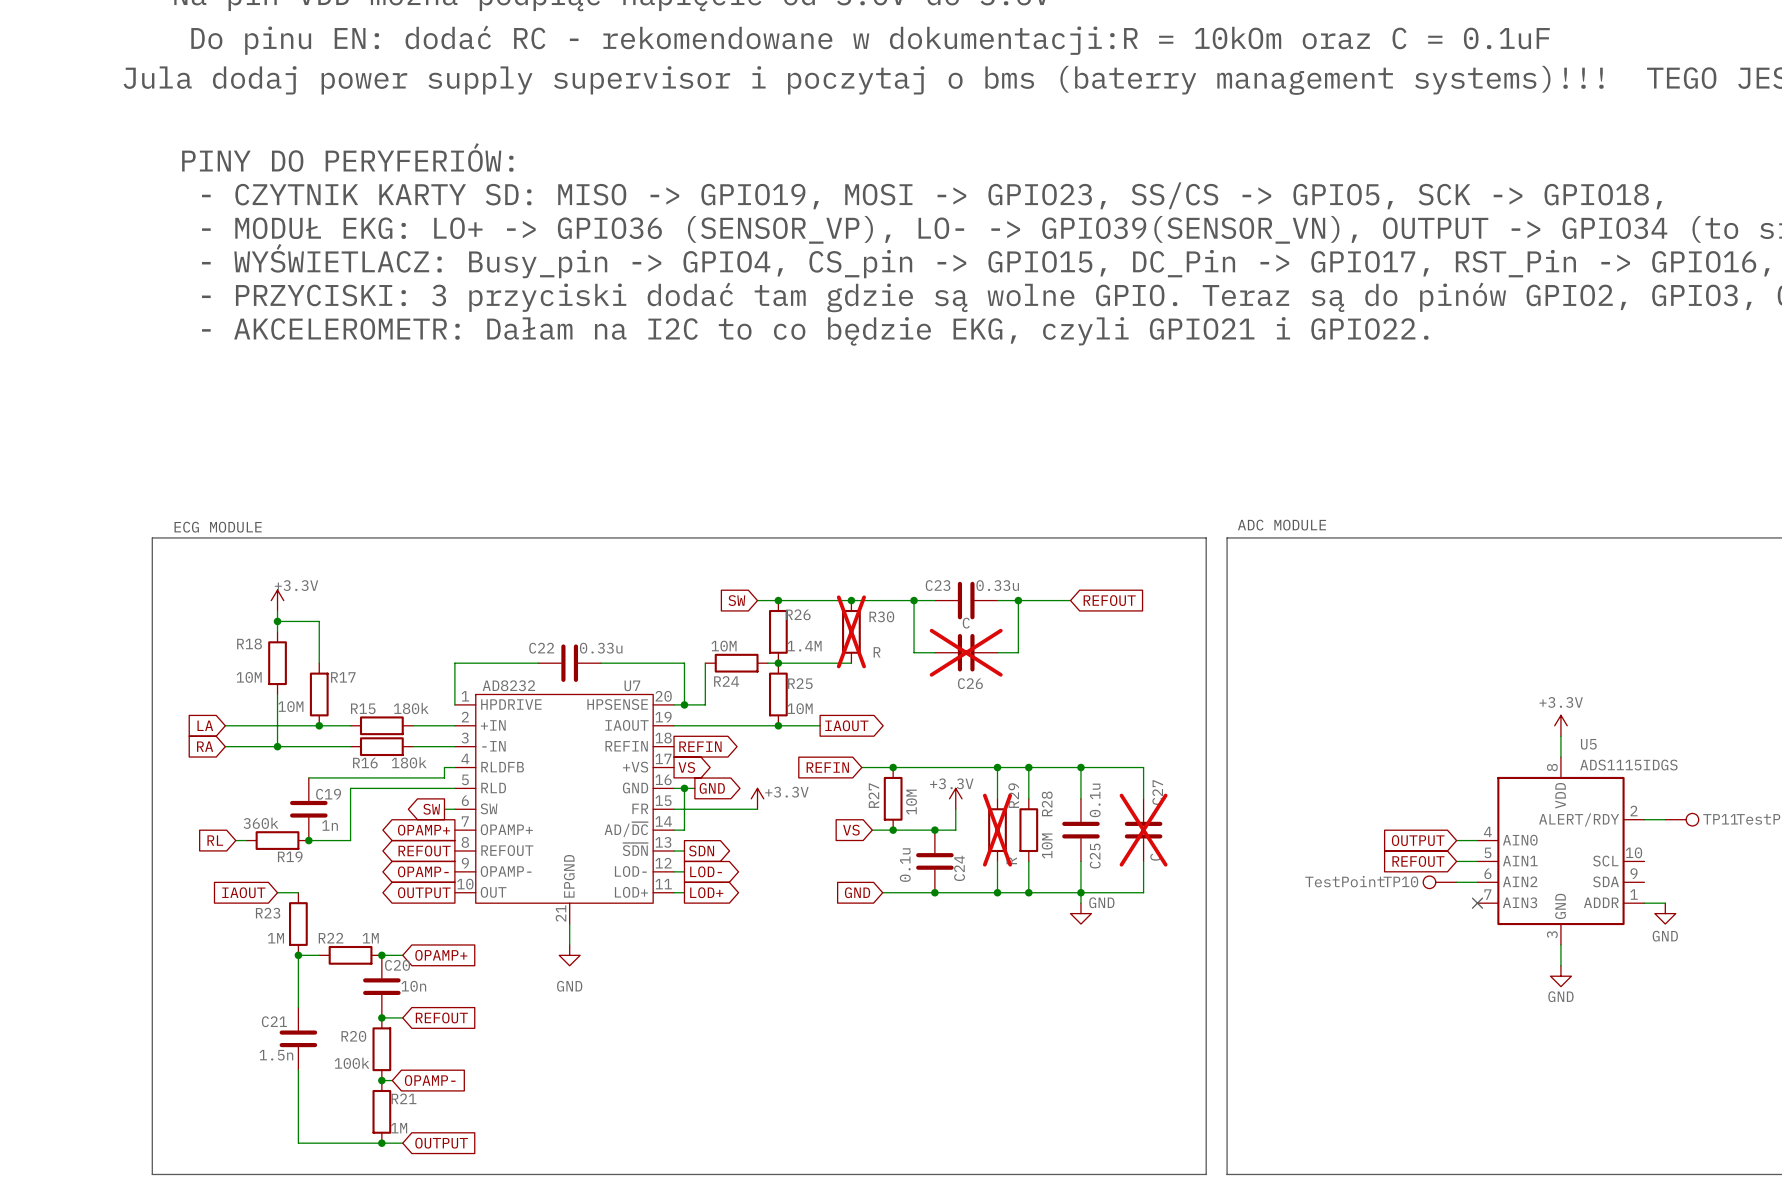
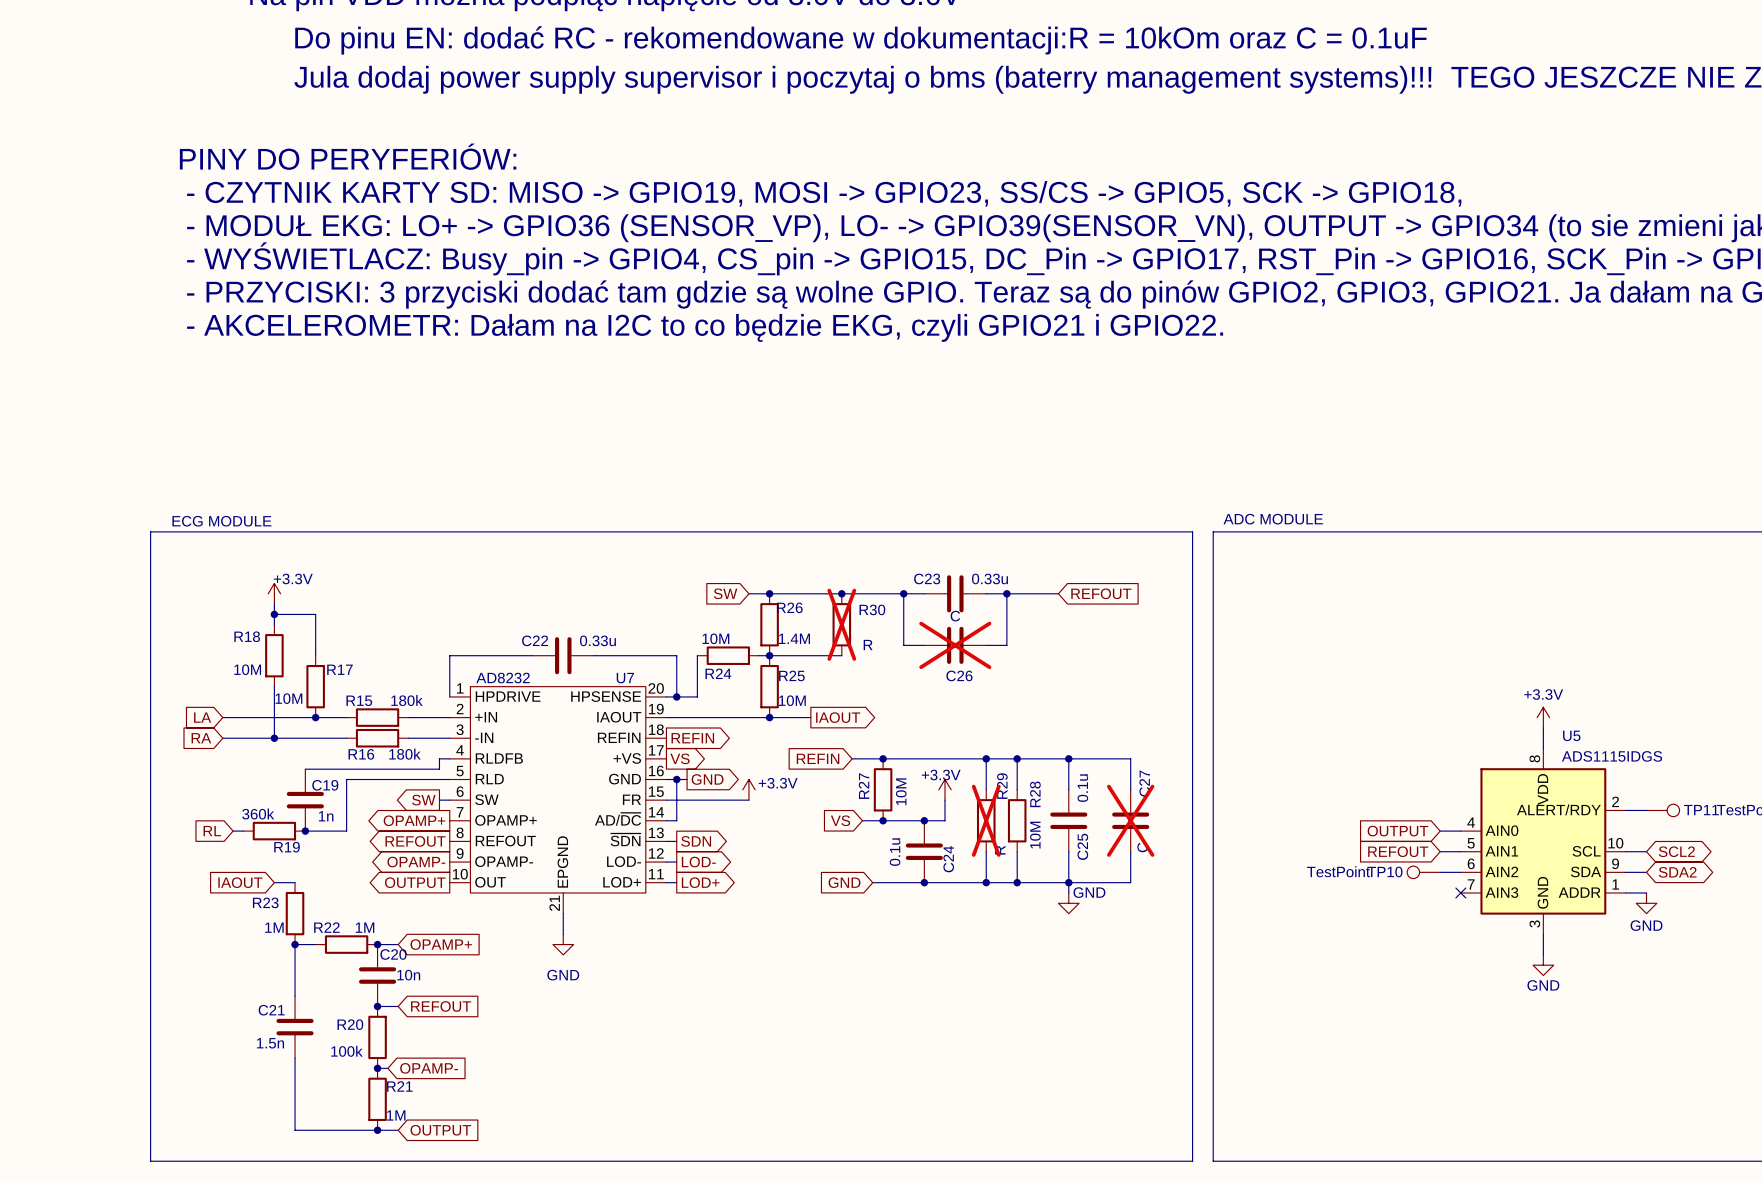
wire: none -> (1625, 851) (1646, 851)
global label: none -> SCL2 (1676, 851)
wire: none -> (1625, 872) (1646, 872)
global label: none -> SDA2 (1677, 872)

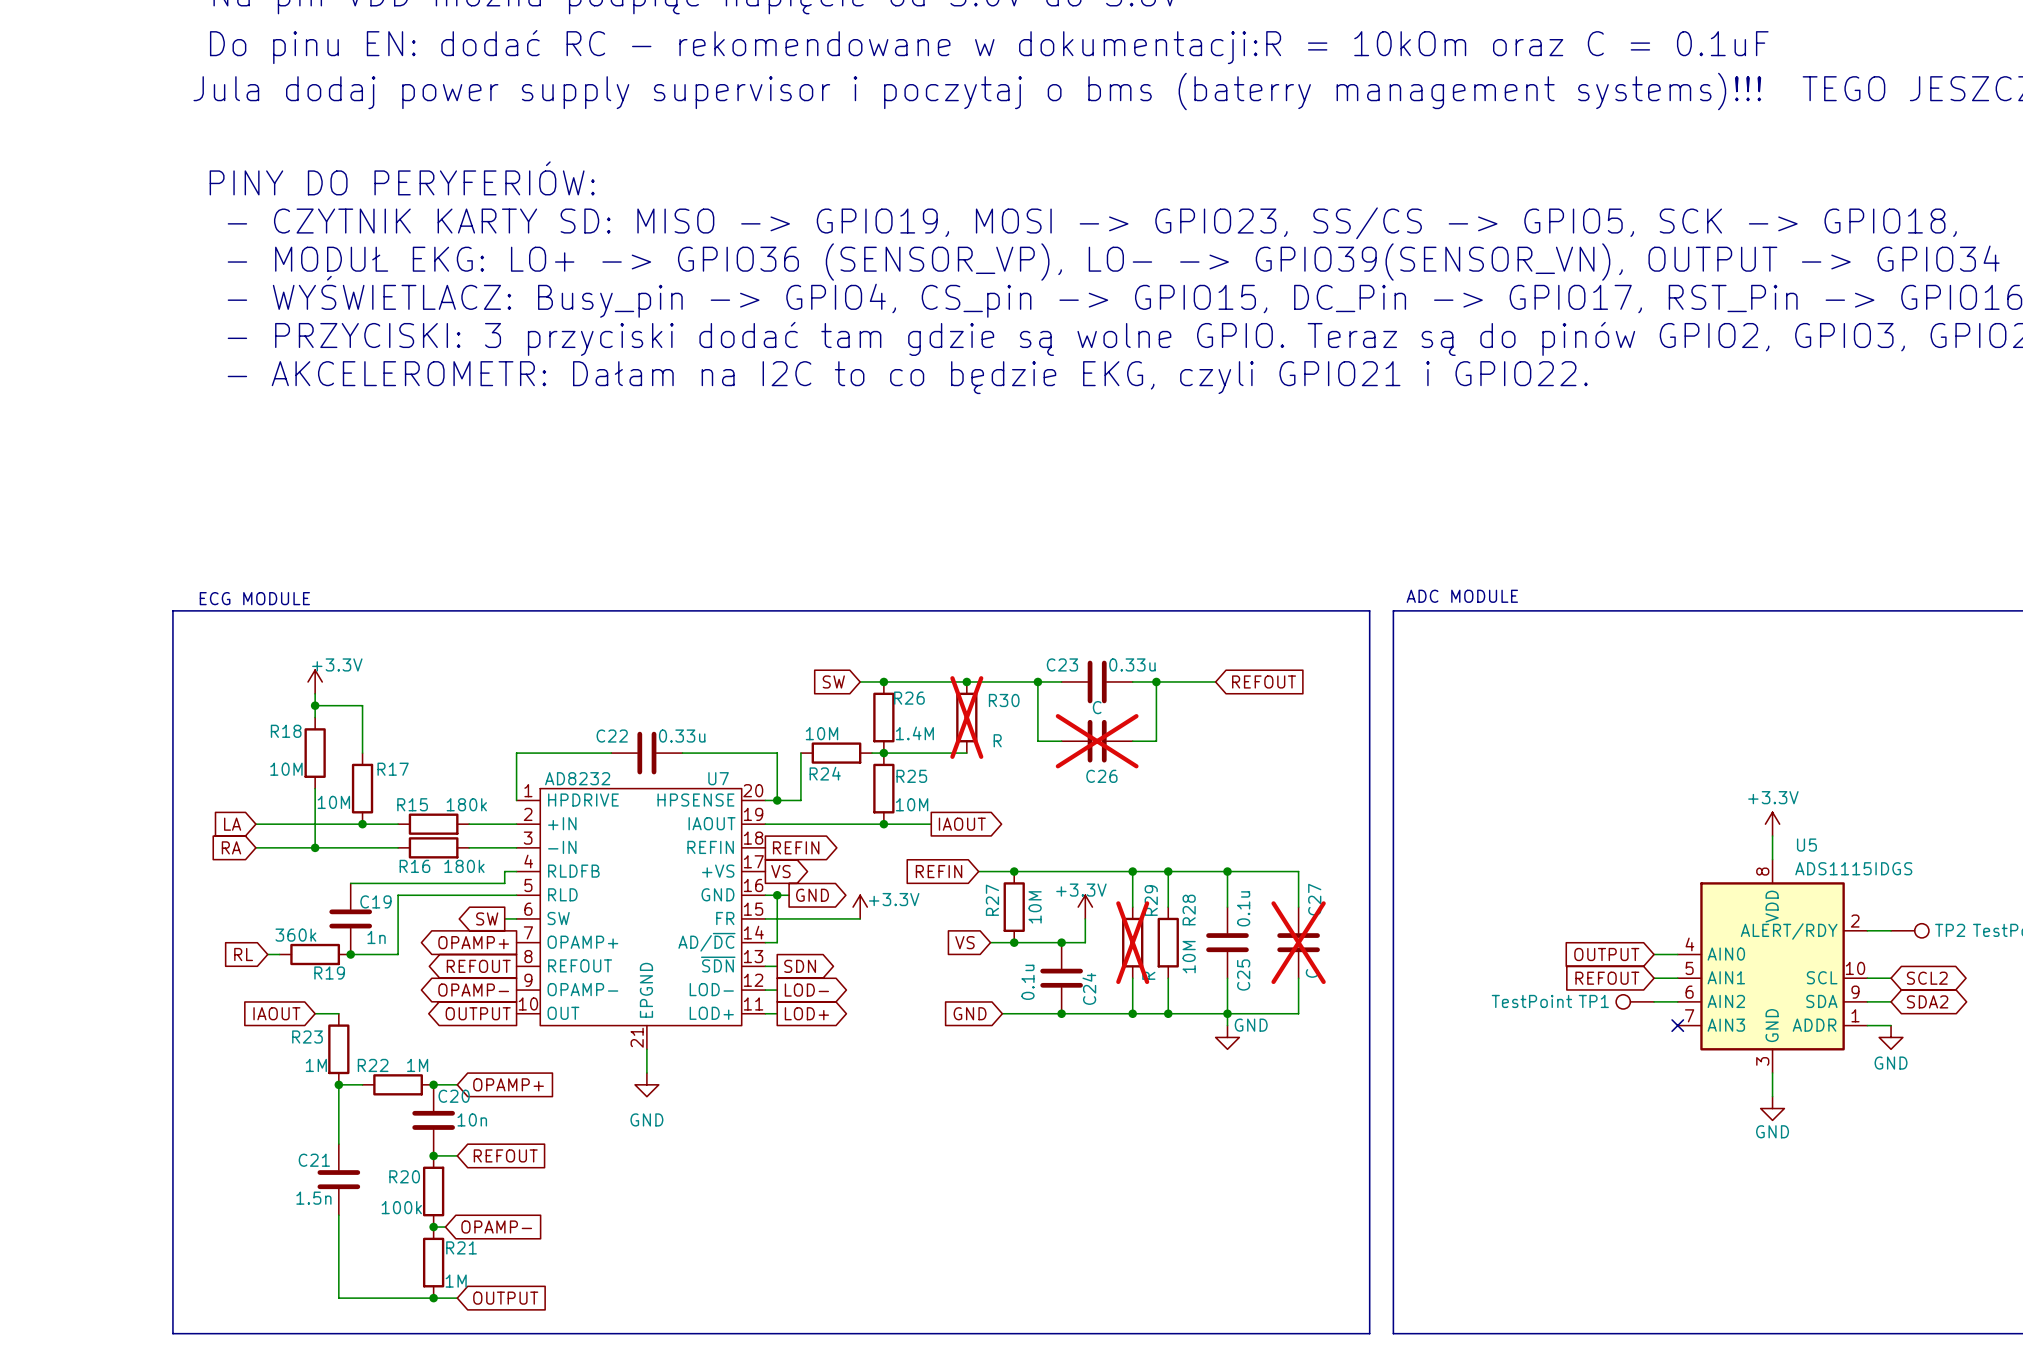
TP11 name: TP11 (1701, 810) -> TP2 (1950, 930)
TP10 name: TP10 (1385, 871) -> TP1 (1593, 1001)

